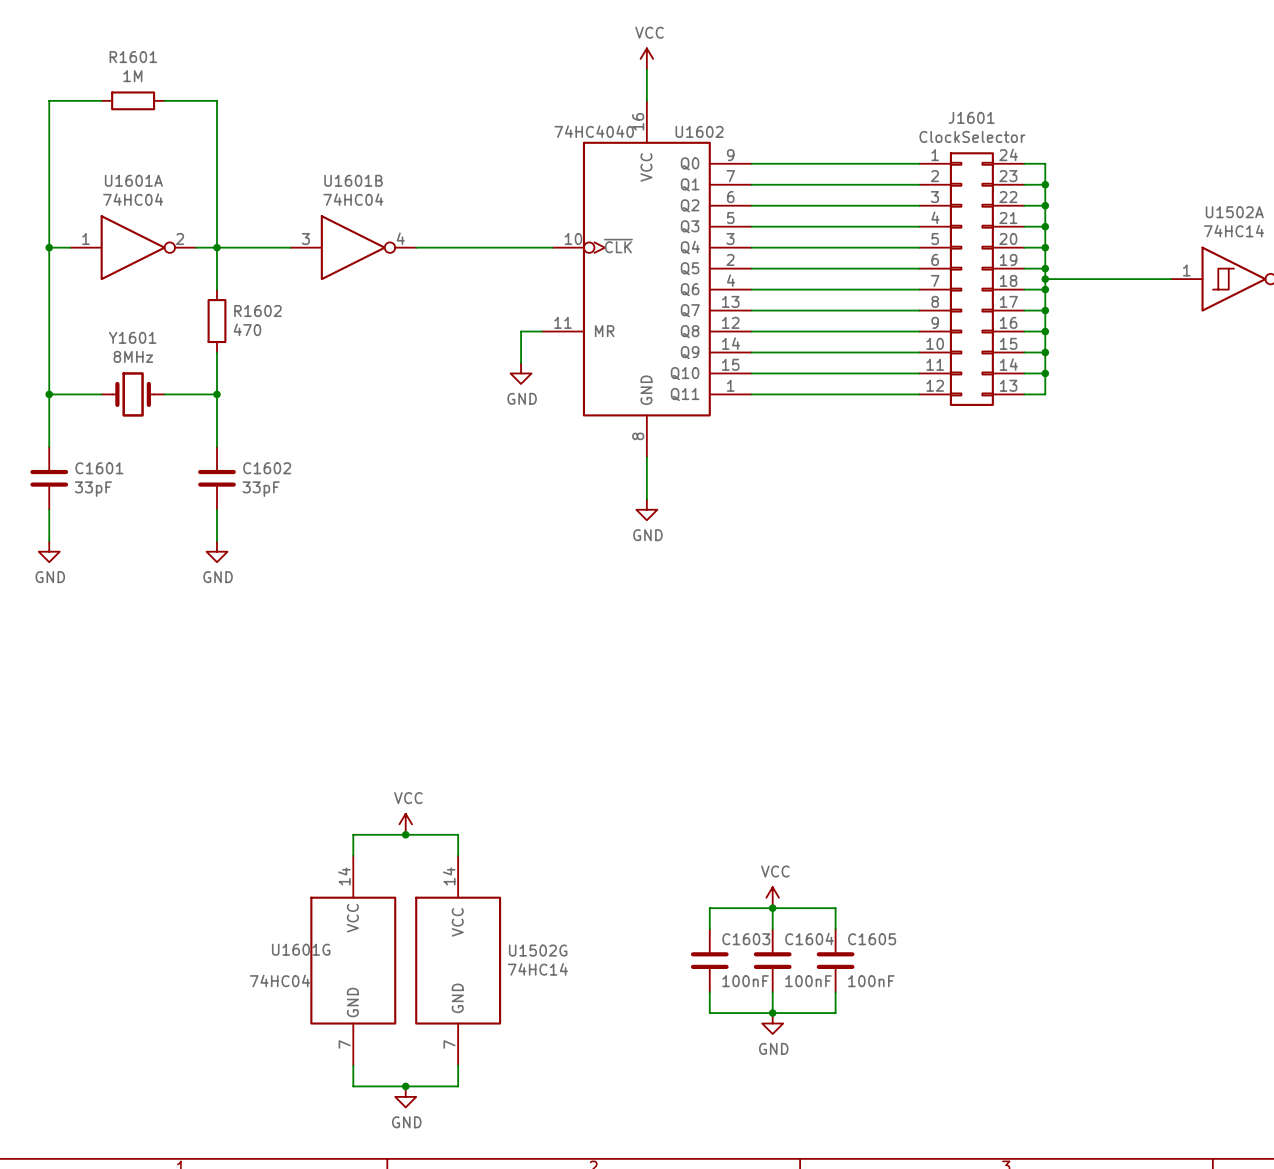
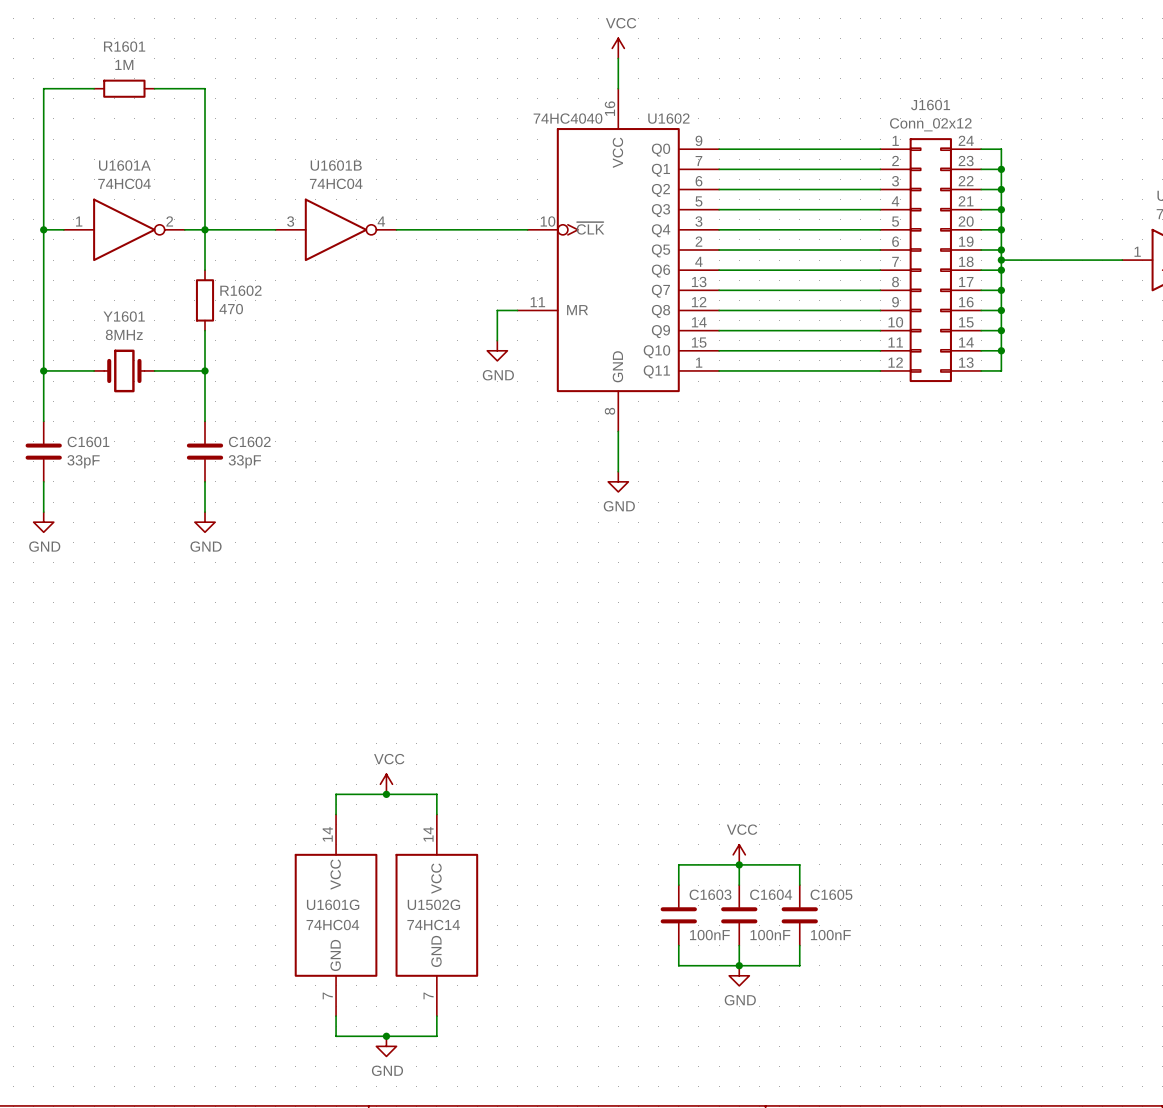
J1601 value: ClockSelector (972, 136) -> Conn_02x12 (930, 124)
U1601G name position: U1601G (301, 949) -> U1601G (333, 904)
U1502G name position: U1502G (538, 950) -> U1502G (433, 904)
U1502G value position: 74HC14 (537, 969) -> 74HC14 (433, 925)
U1601G value position: 74HC04 (279, 980) -> 74HC04 (332, 925)

